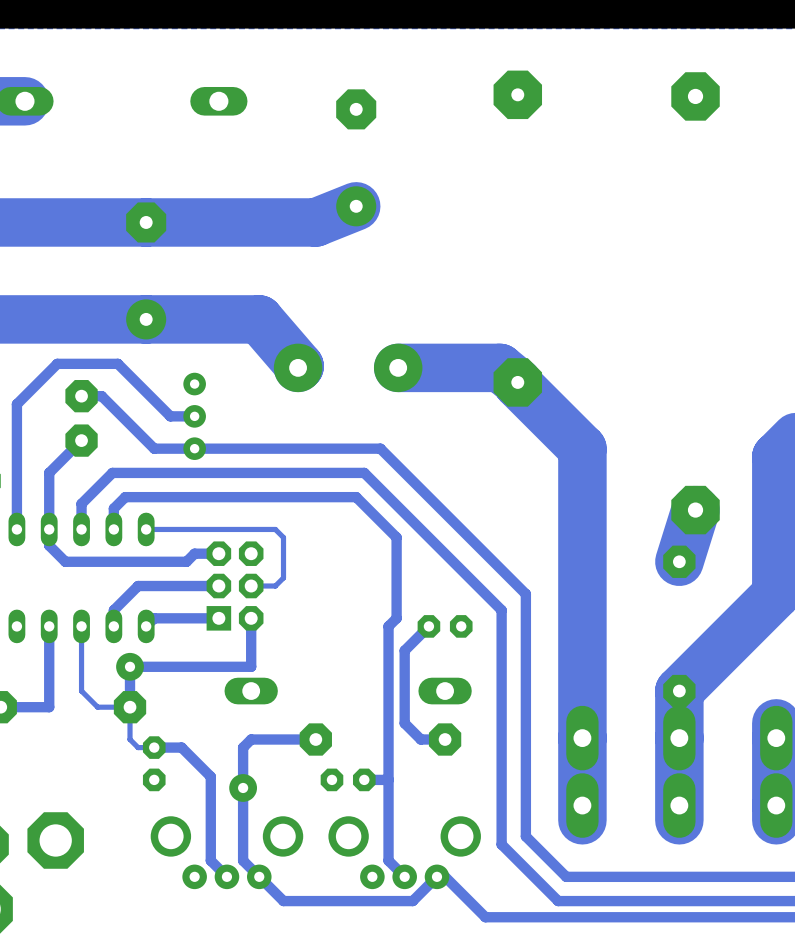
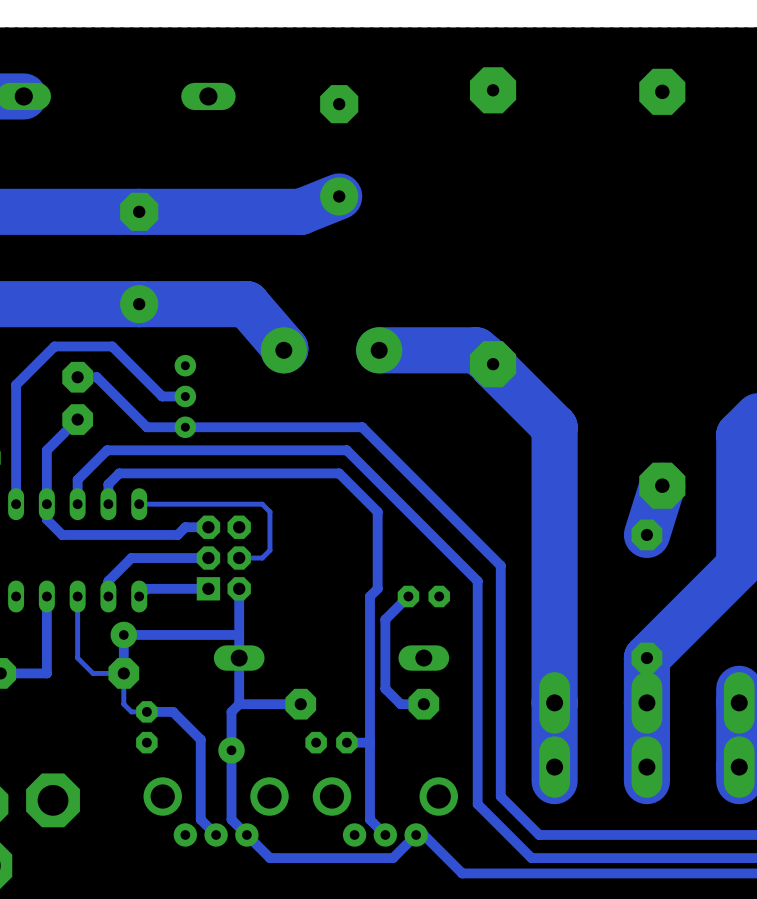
track: none -> (239, 634) (239, 704)

